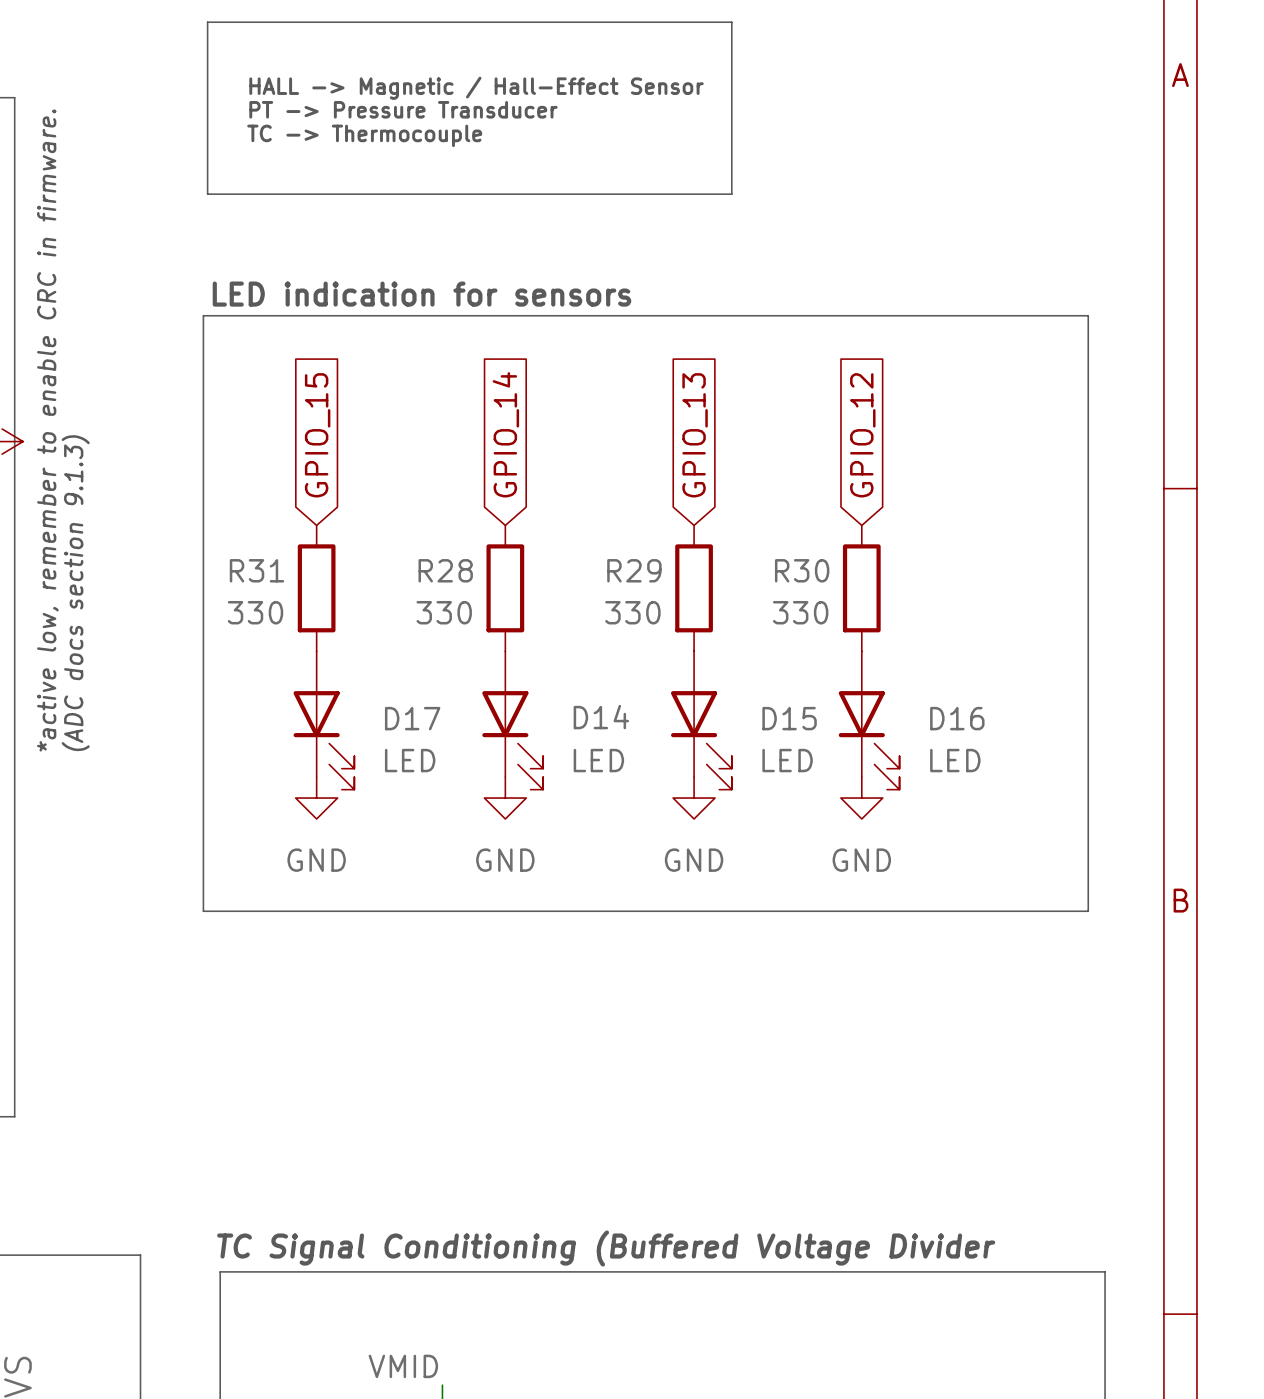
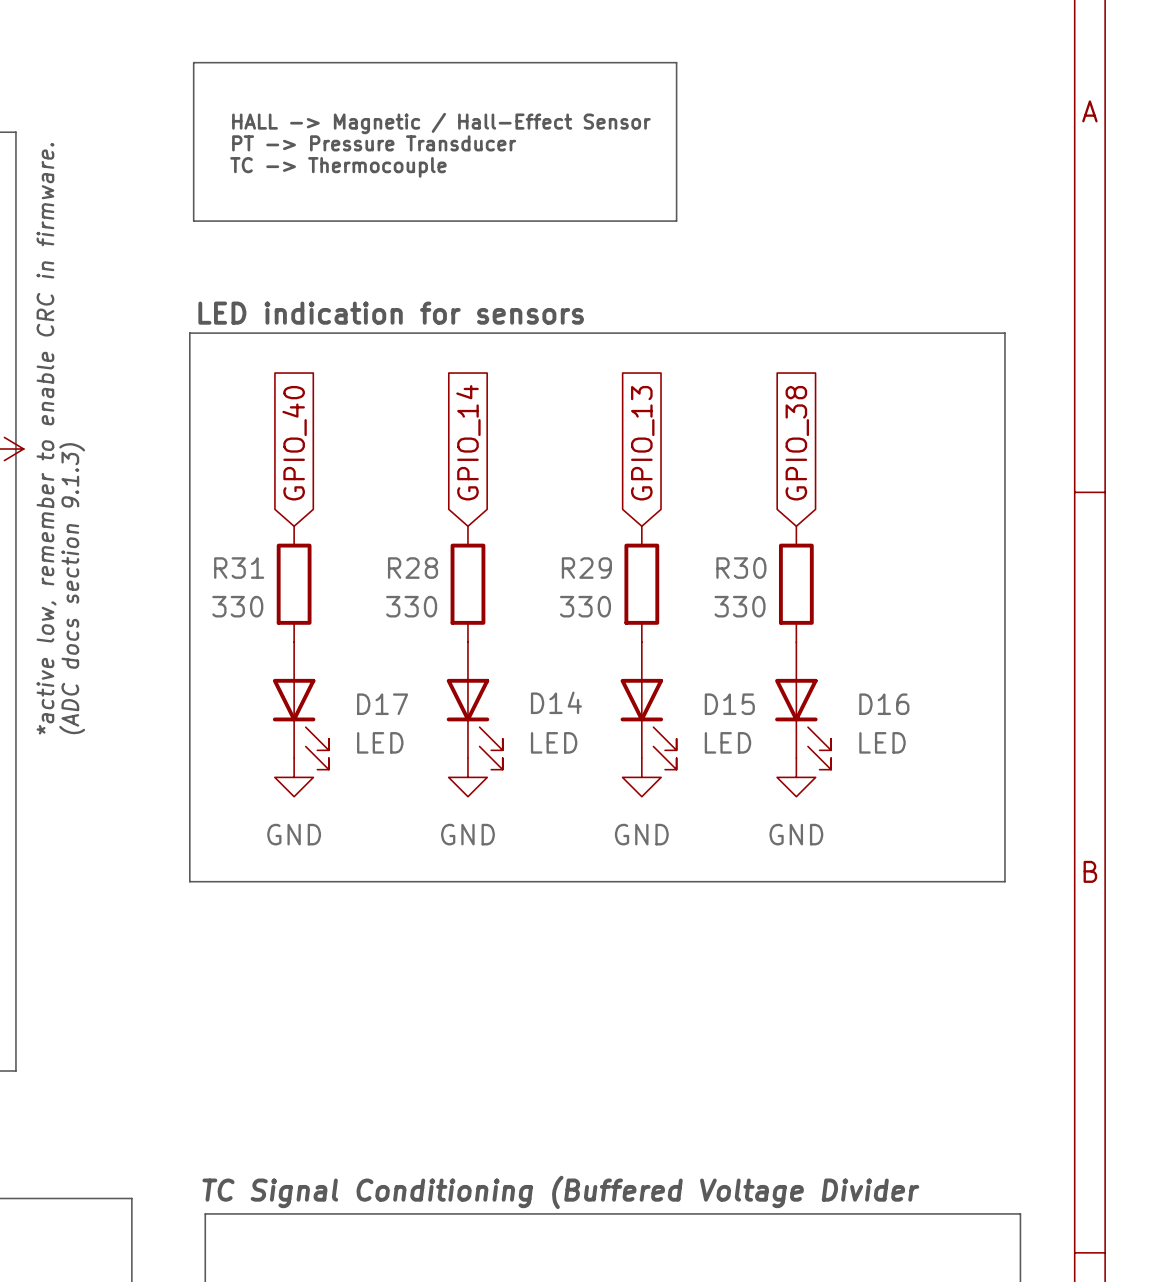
global label: GPIO_15 (317, 435) -> GPIO_40 (294, 443)
global label: GPIO_12 (862, 435) -> GPIO_38 (797, 443)

